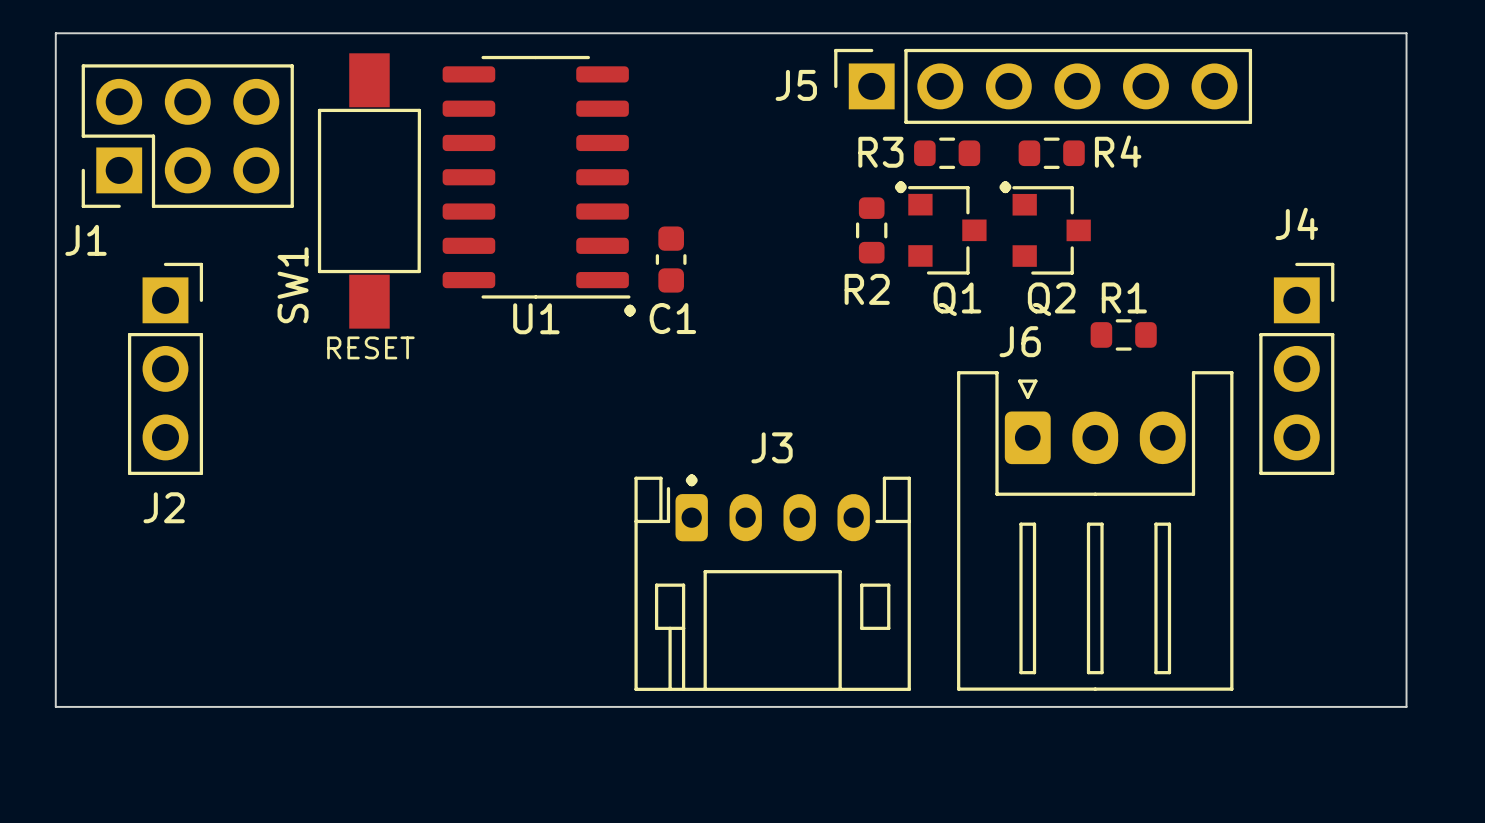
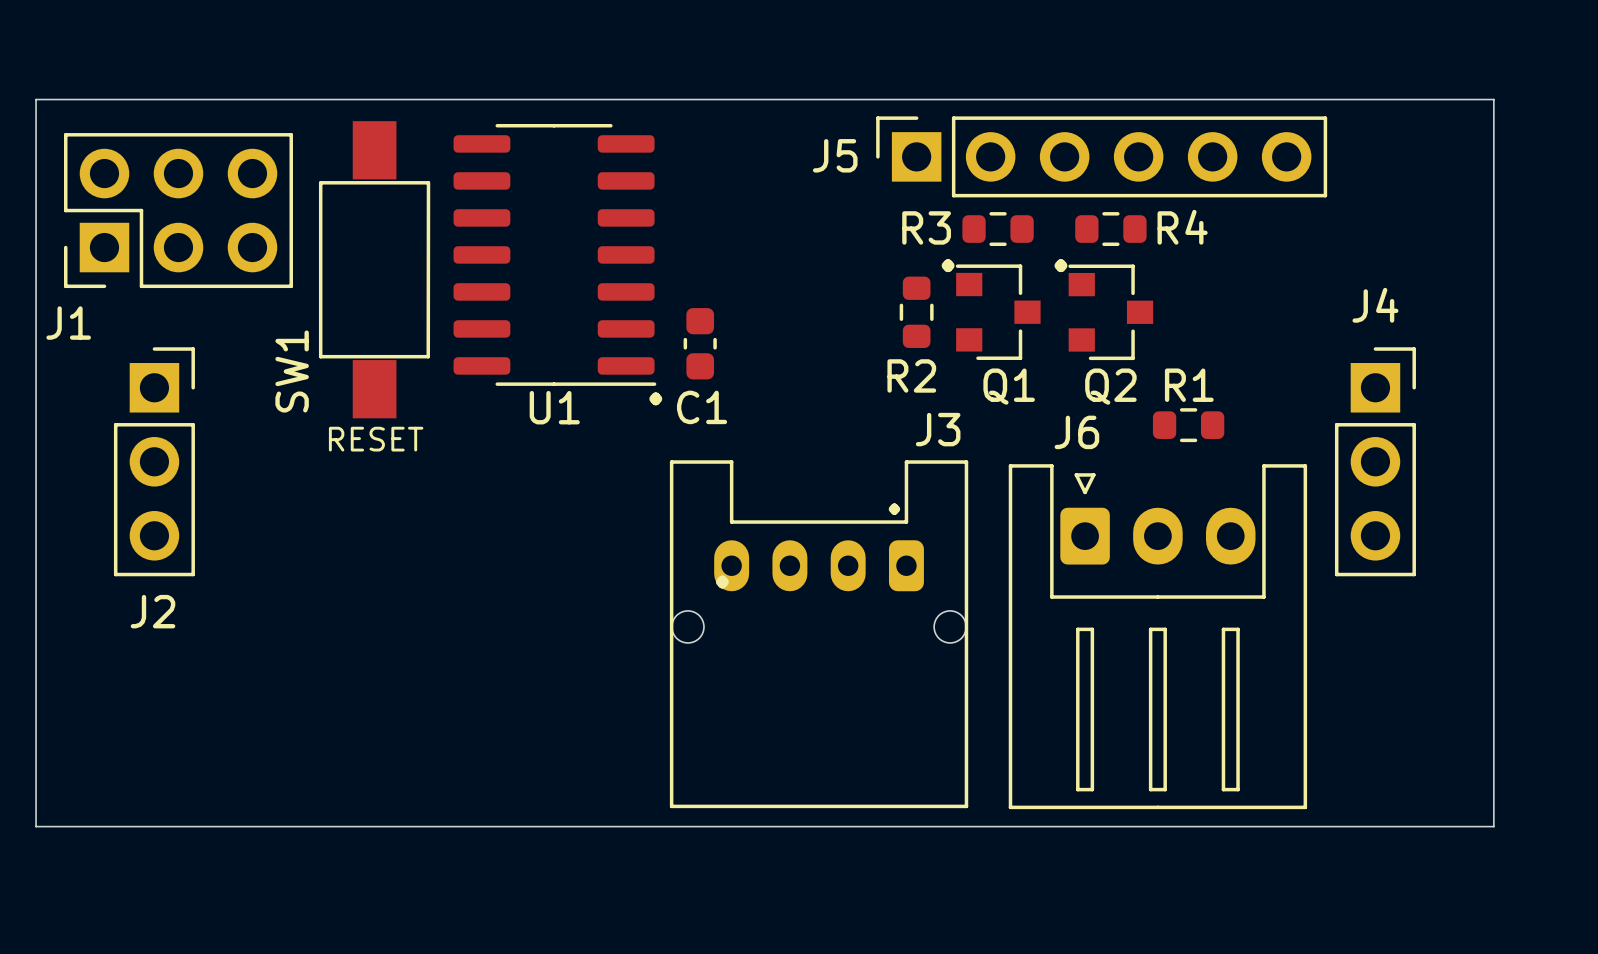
J3 name position: J3 (772, 447) -> J3 (938, 429)
J3 footprint: [634, 476, 911, 691] -> [669, 460, 969, 809]

